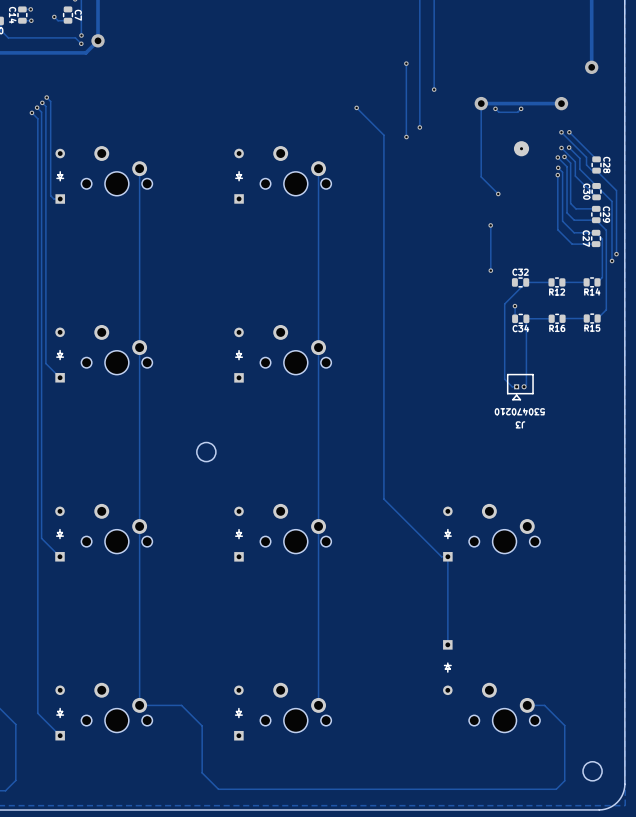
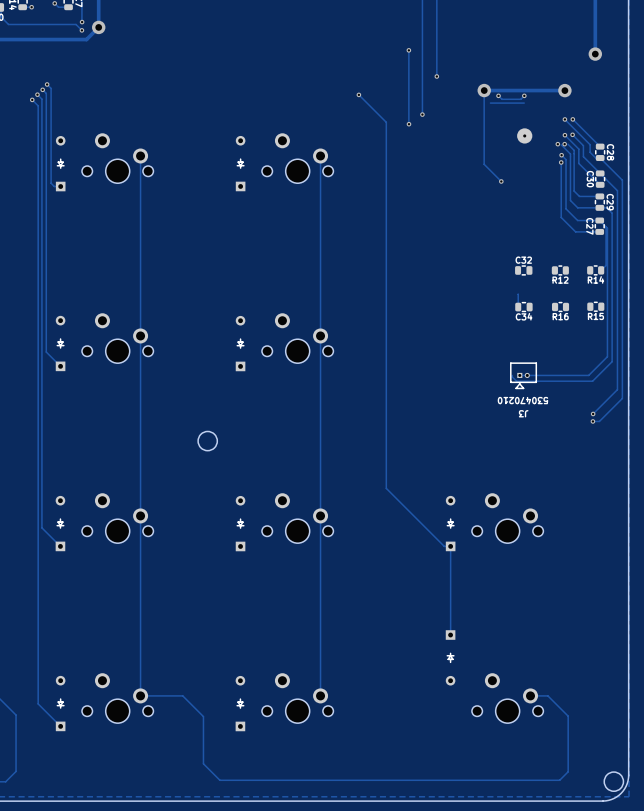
track: none -> (524, 103) (490, 103)
via: none -> (557, 144)
via: none -> (564, 144)
via: (564, 156) -> none
via: (557, 157) -> none
track: (616, 190) (616, 254) -> (620, 178) (622, 180) (622, 398) (599, 421) (592, 421)
track: (611, 201) (611, 260) -> (615, 188) (617, 190) (617, 389) (593, 413)
track: (596, 220) (606, 230) (606, 309) (597, 318) -> (599, 207) (606, 207) (612, 213) (612, 361) (592, 381) (516, 381) (512, 375)
track: (490, 225) (490, 270) -> none
via: (490, 225) -> none
via: (616, 254) -> none
via: (612, 261) -> none
via: (490, 270) -> none
track: (551, 282) (526, 282) (504, 303) (504, 379) (512, 386) (516, 386) -> (606, 226) (607, 356) (588, 375) (519, 375)
track: (586, 282) (562, 282) -> none
via: (514, 306) -> none
track: (526, 318) (526, 384) (524, 386) -> none
track: (551, 318) (526, 318) -> none
track: (586, 318) (562, 318) -> none
via: none -> (593, 413)
via: none -> (592, 421)
round board edge position: (592, 771) -> (613, 781)

